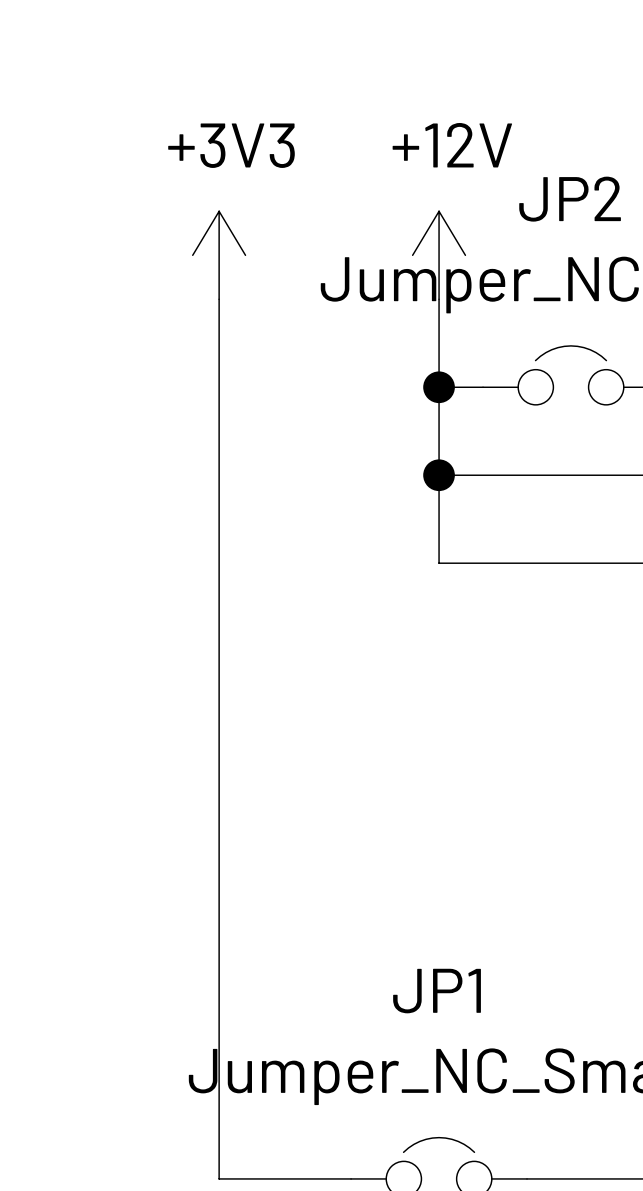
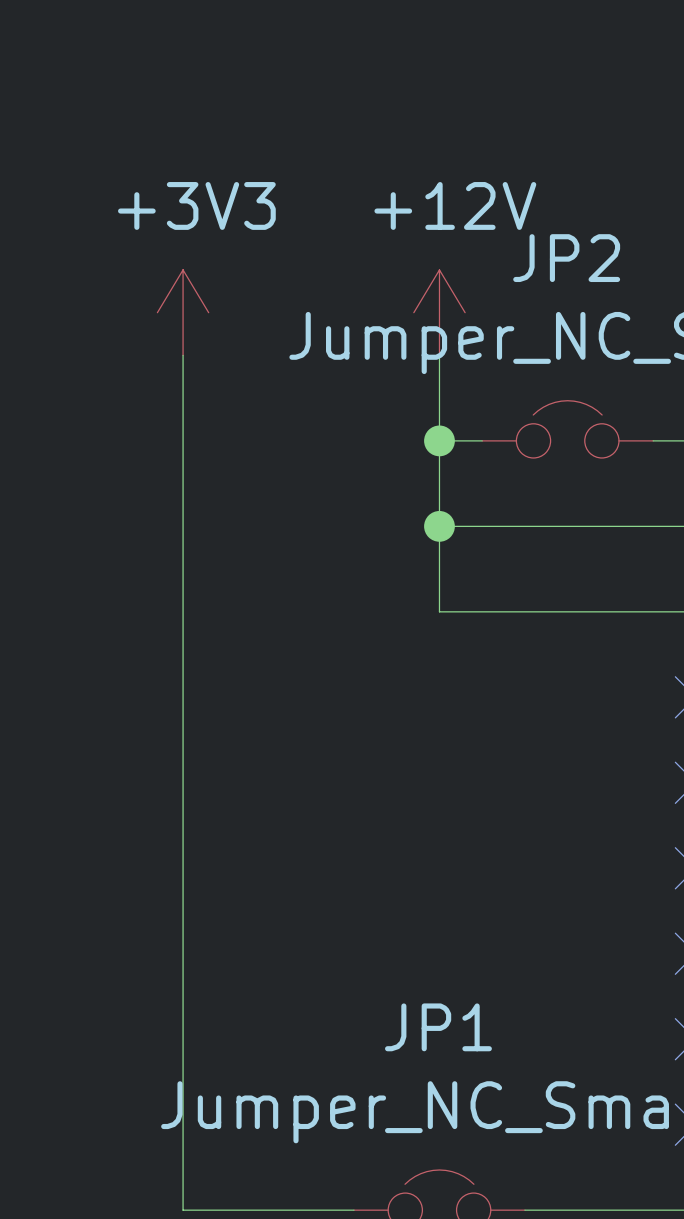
power symbol position: +3V3 (219, 255) -> +3V3 (183, 312)
wire: (219, 299) (219, 1178) -> (183, 355) (183, 1210) (225, 1210)

